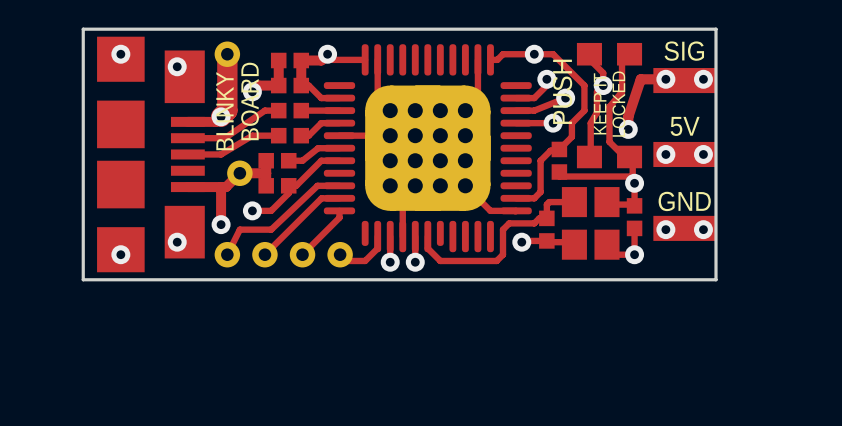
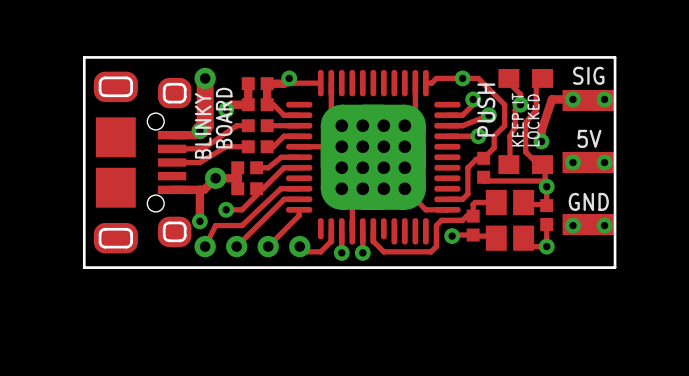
part footprint: [97, 36, 205, 273] -> [93, 71, 192, 254]
via: (120, 54) -> none
via: (177, 66) -> none
via: (177, 242) -> none
via: (120, 254) -> none

